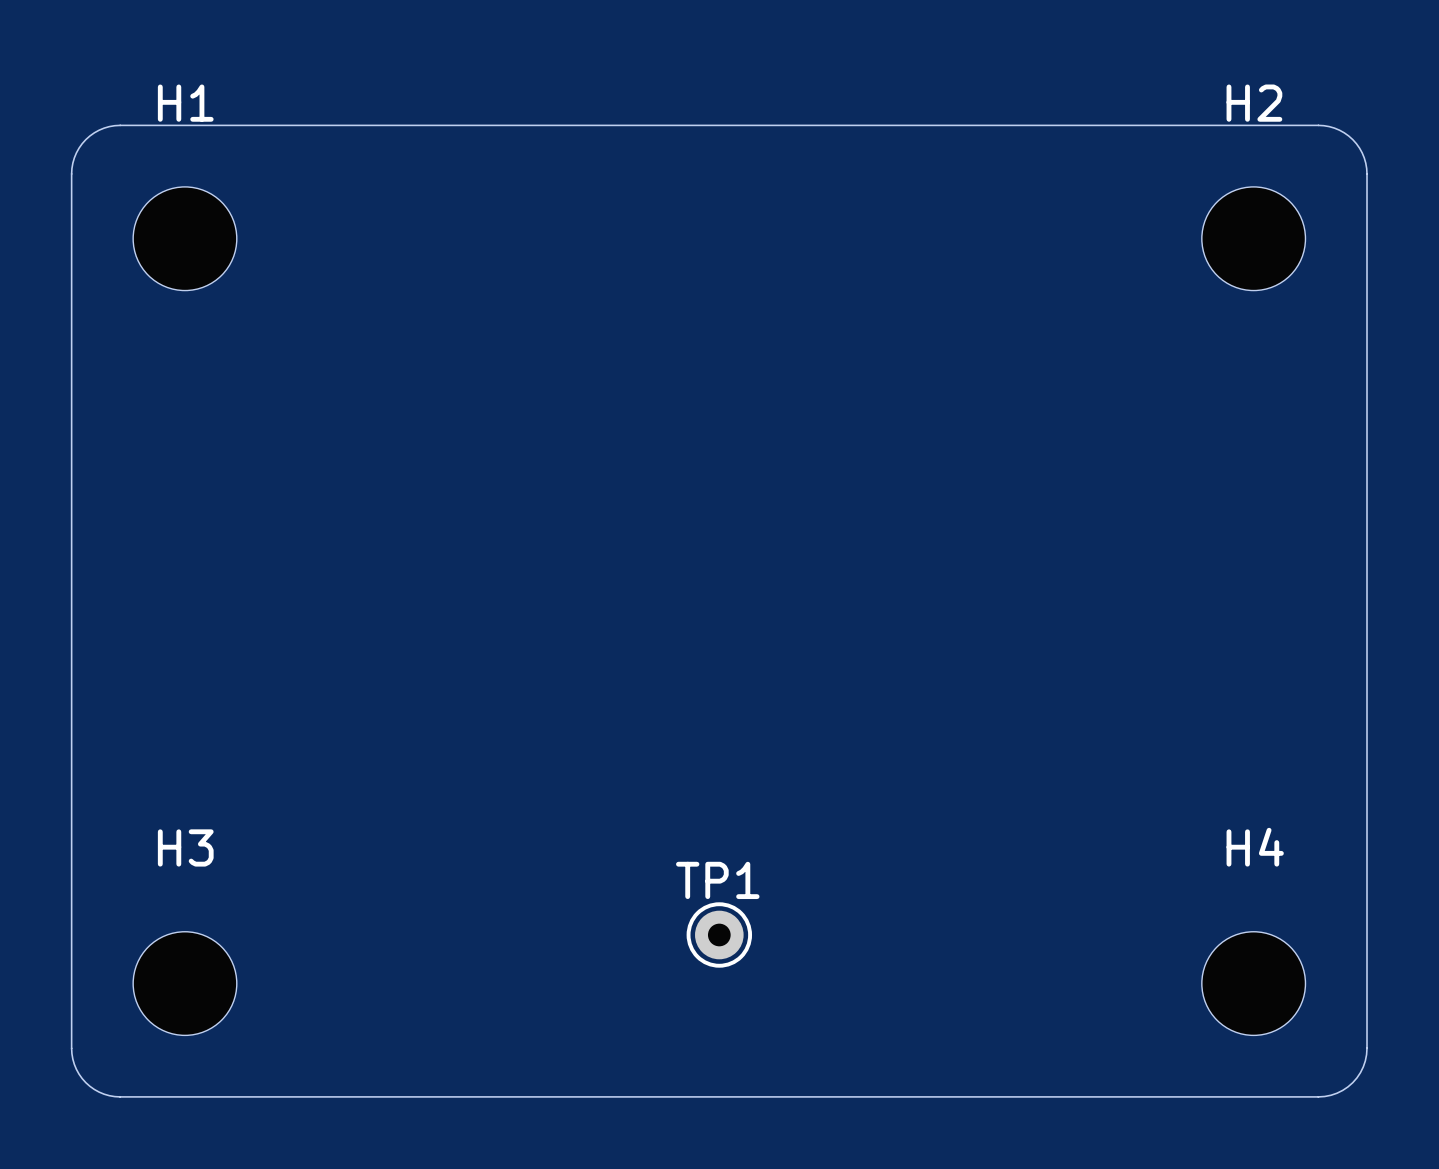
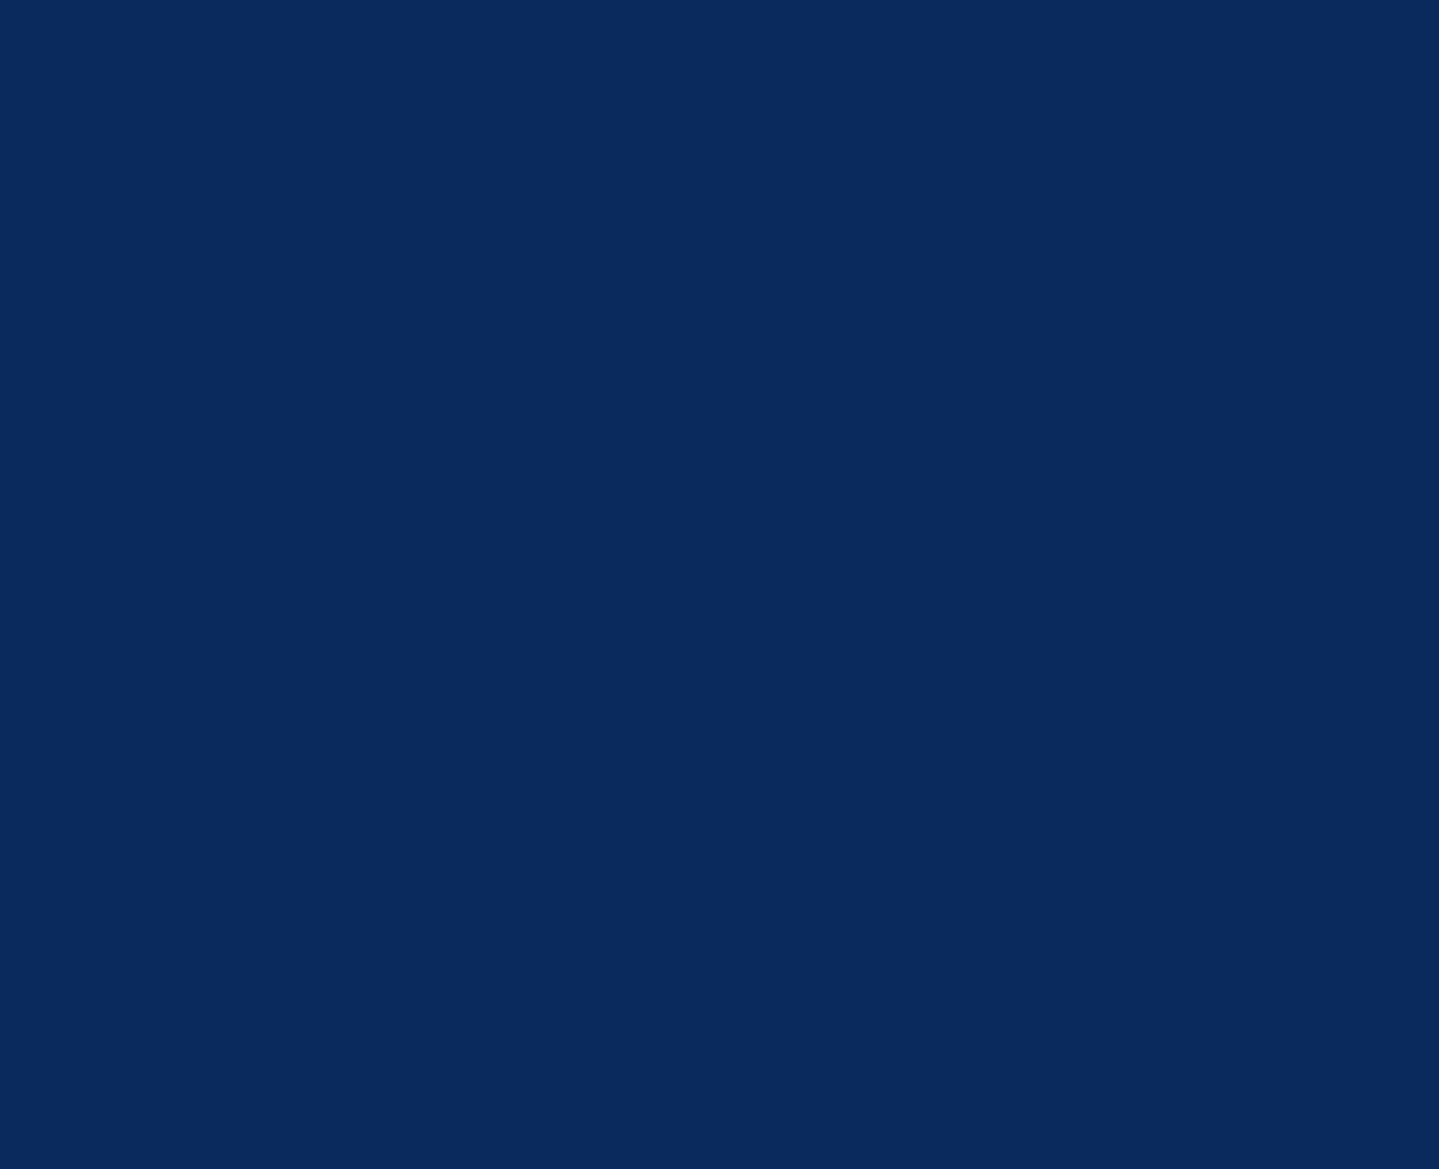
board edge: (120, 125) (1318, 125) (1334, 128) (1348, 135) (1362, 152) (1367, 173) (1367, 1048) (1363, 1066) (1356, 1077) (1347, 1086) (1337, 1093) (1318, 1096) (120, 1096) (104, 1094) (89, 1086) (76, 1069) (71, 1048) (71, 173) (74, 157) (85, 139) (99, 130) (120, 125) -> none
H1: (184, 238) -> none
H2: (1253, 238) -> none
TP1: (719, 934) -> none
H3: (184, 983) -> none
H4: (1253, 983) -> none

